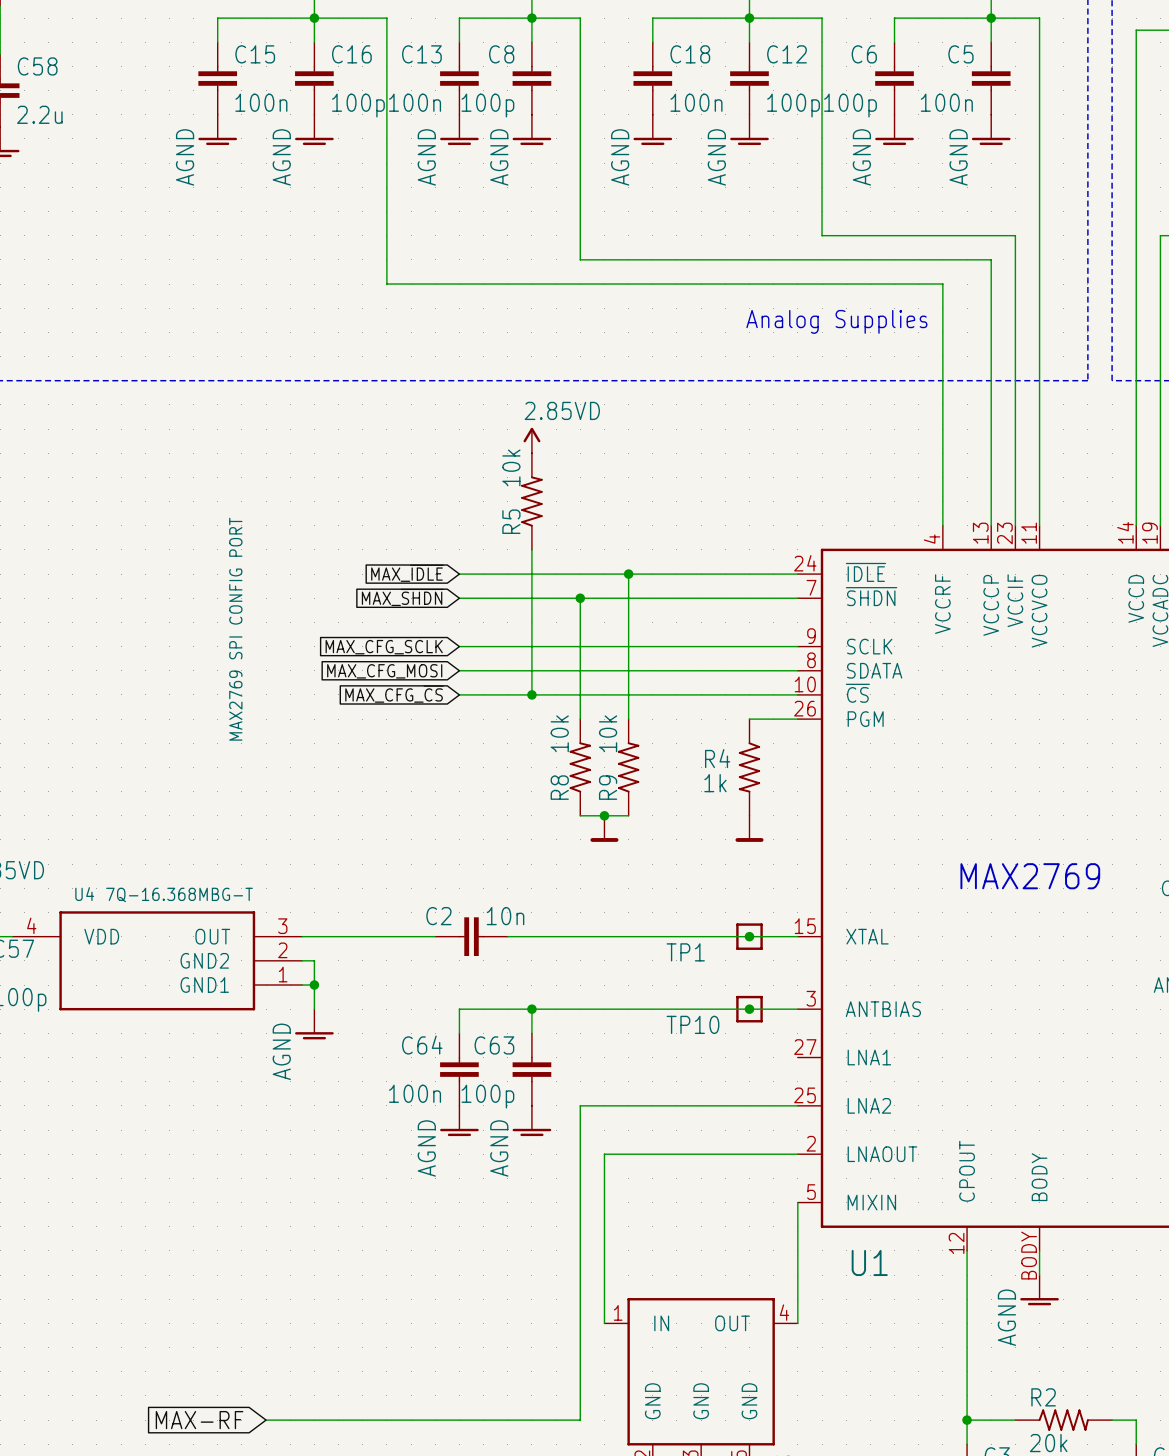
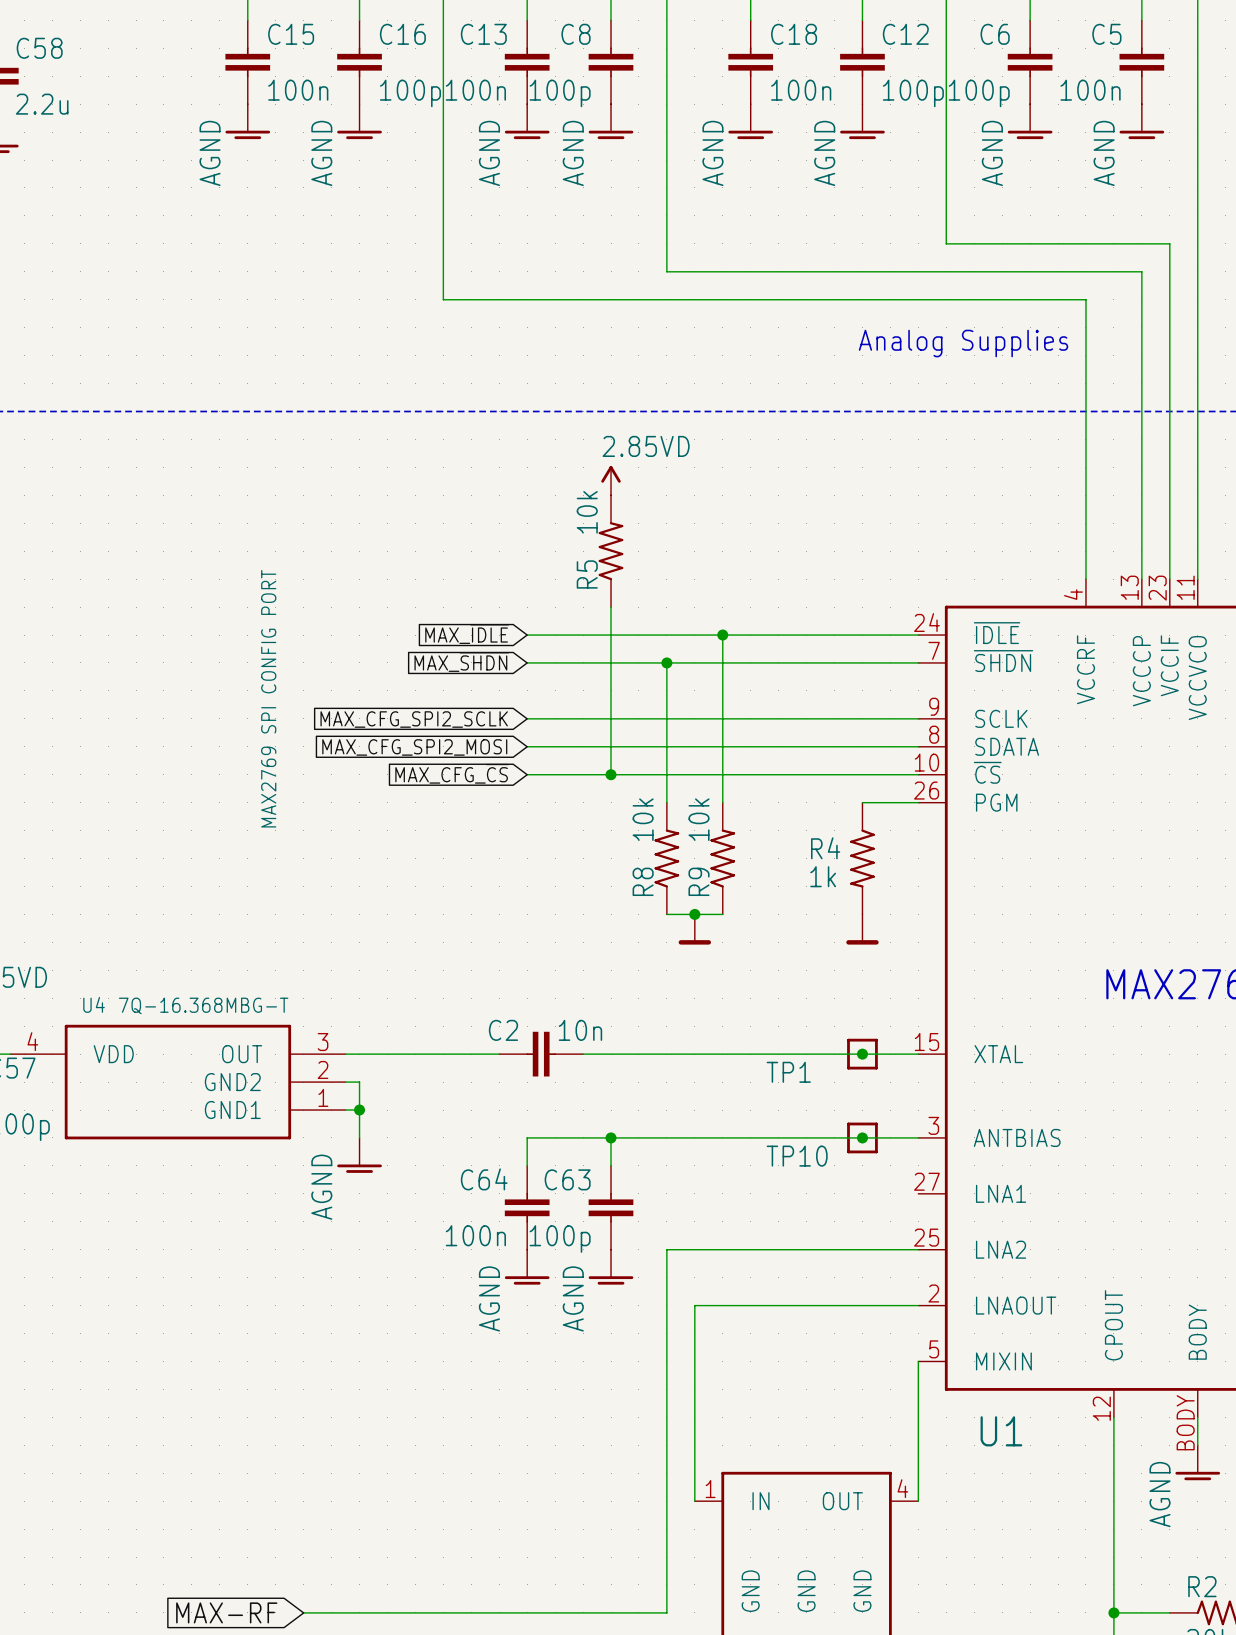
global label: MAX_CFG_SCLK (384, 647) -> MAX_CFG_SPI2_SCLK (414, 719)
global label: MAX_CFG_MOSI (384, 671) -> MAX_CFG_SPI2_MOSI (414, 747)

